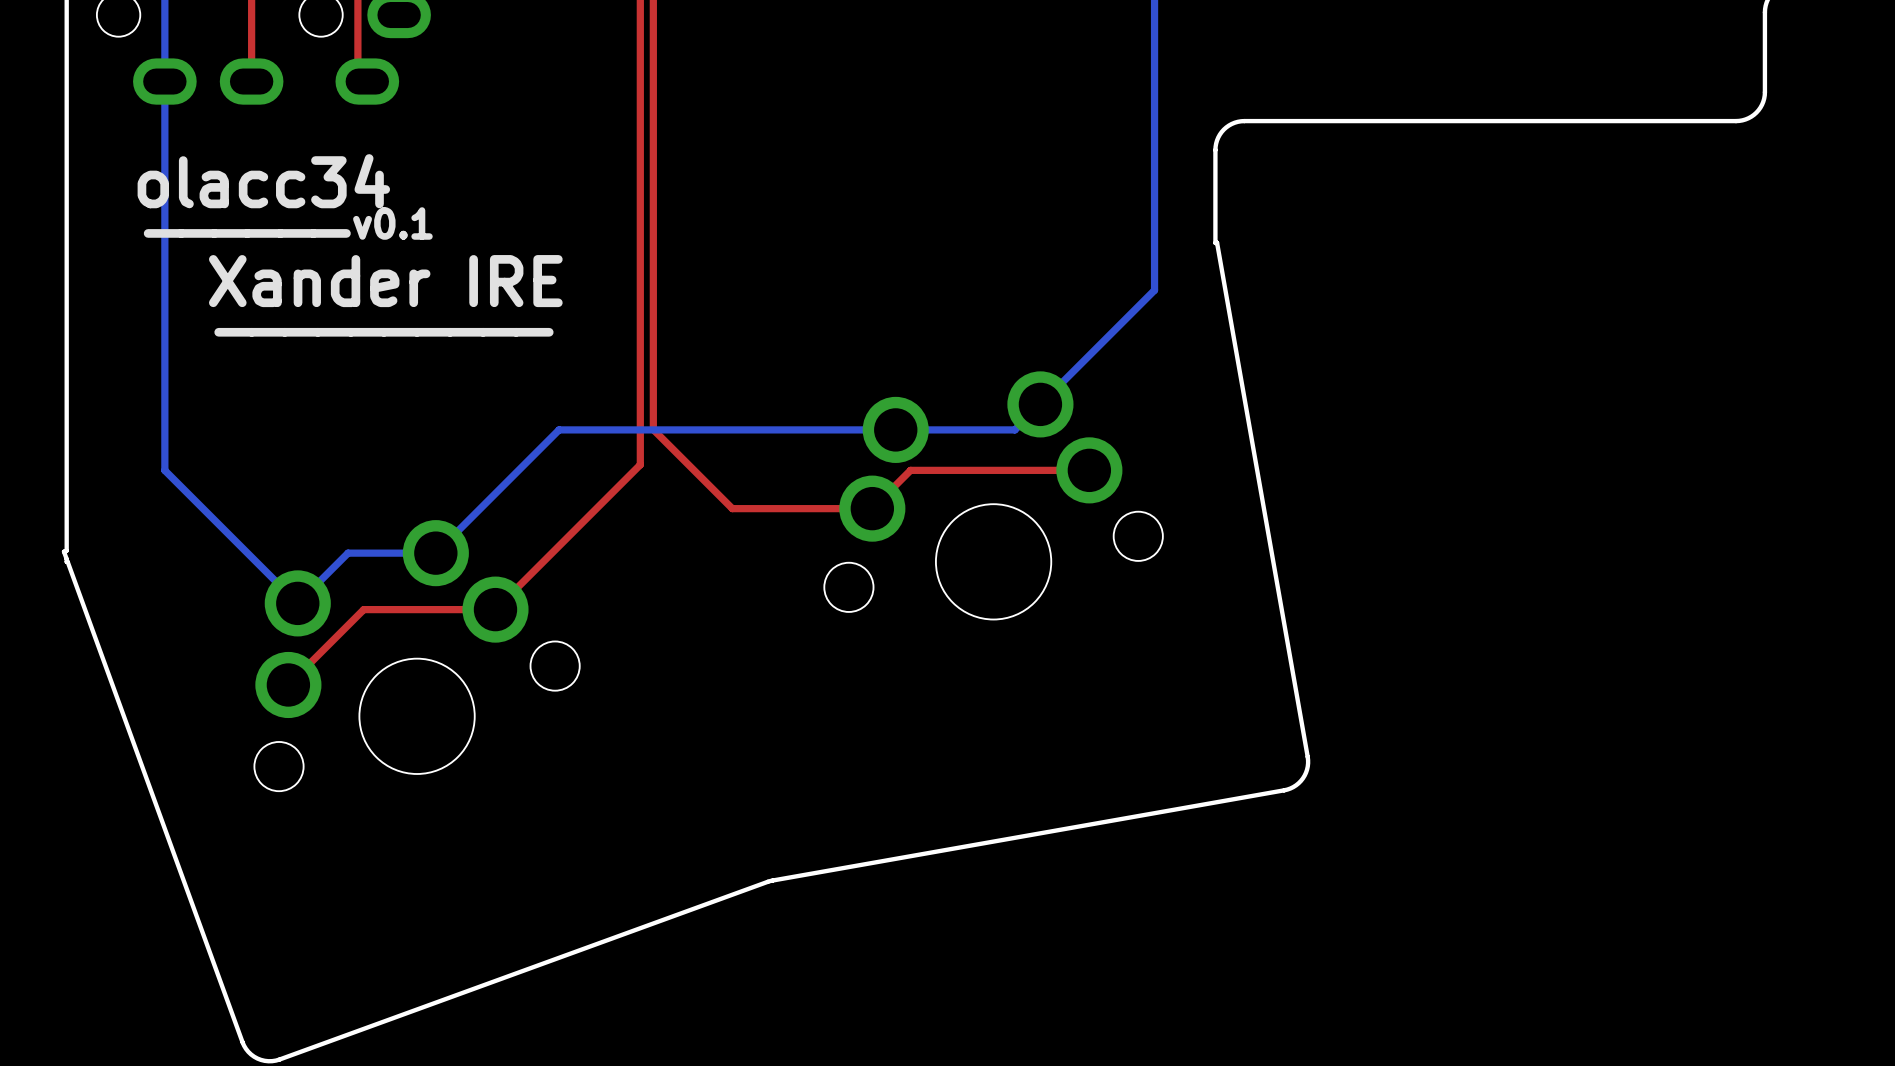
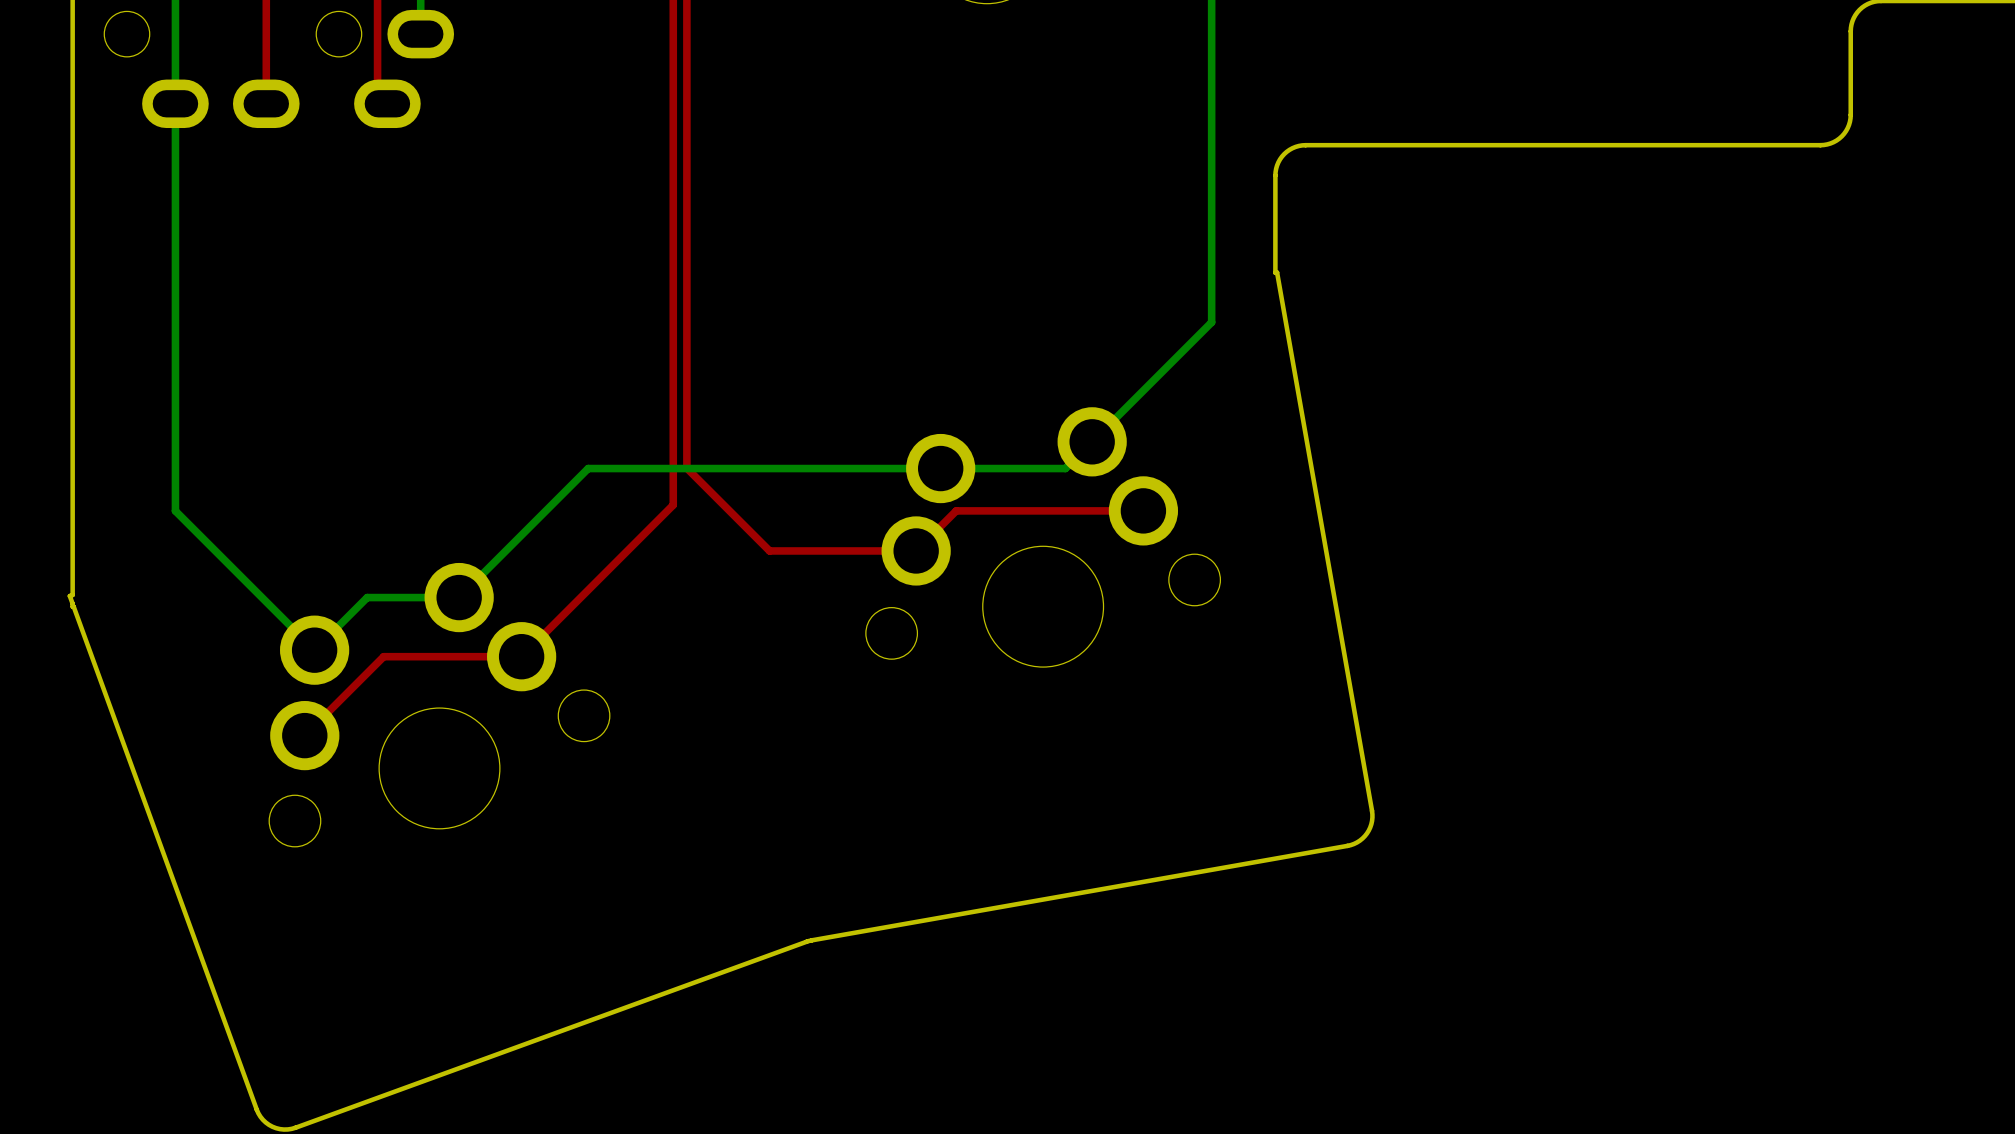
text: olacc34 (263, 181) -> none
text: v0.1 (392, 223) -> none
text: ______ (247, 233) -> none
text: Xander IRE (385, 281) -> none
text: __________ (383, 332) -> none

